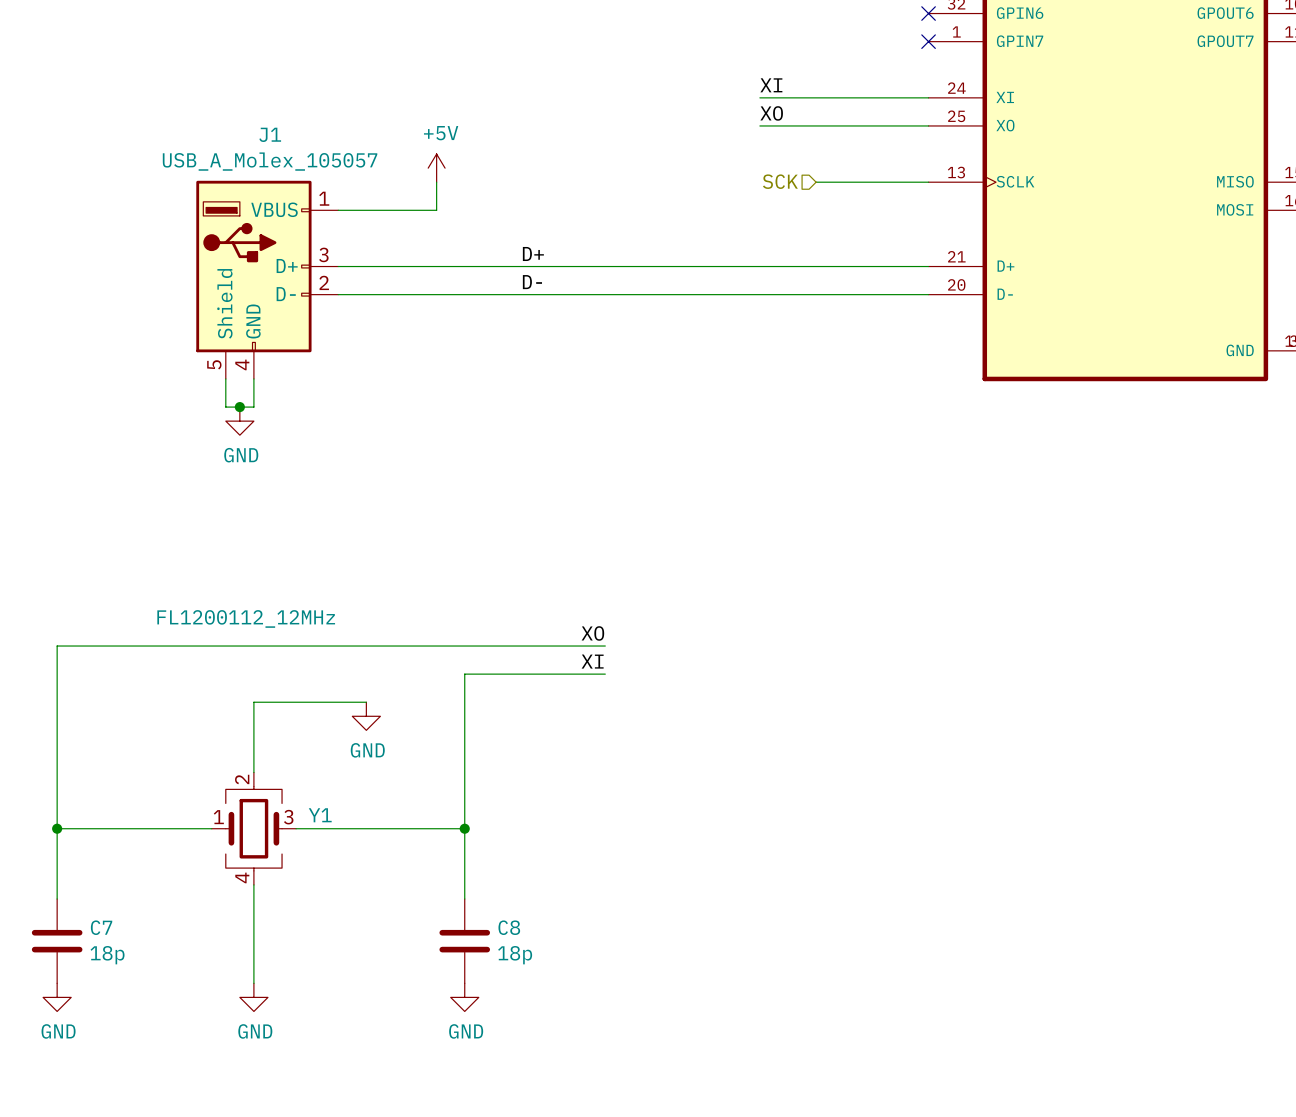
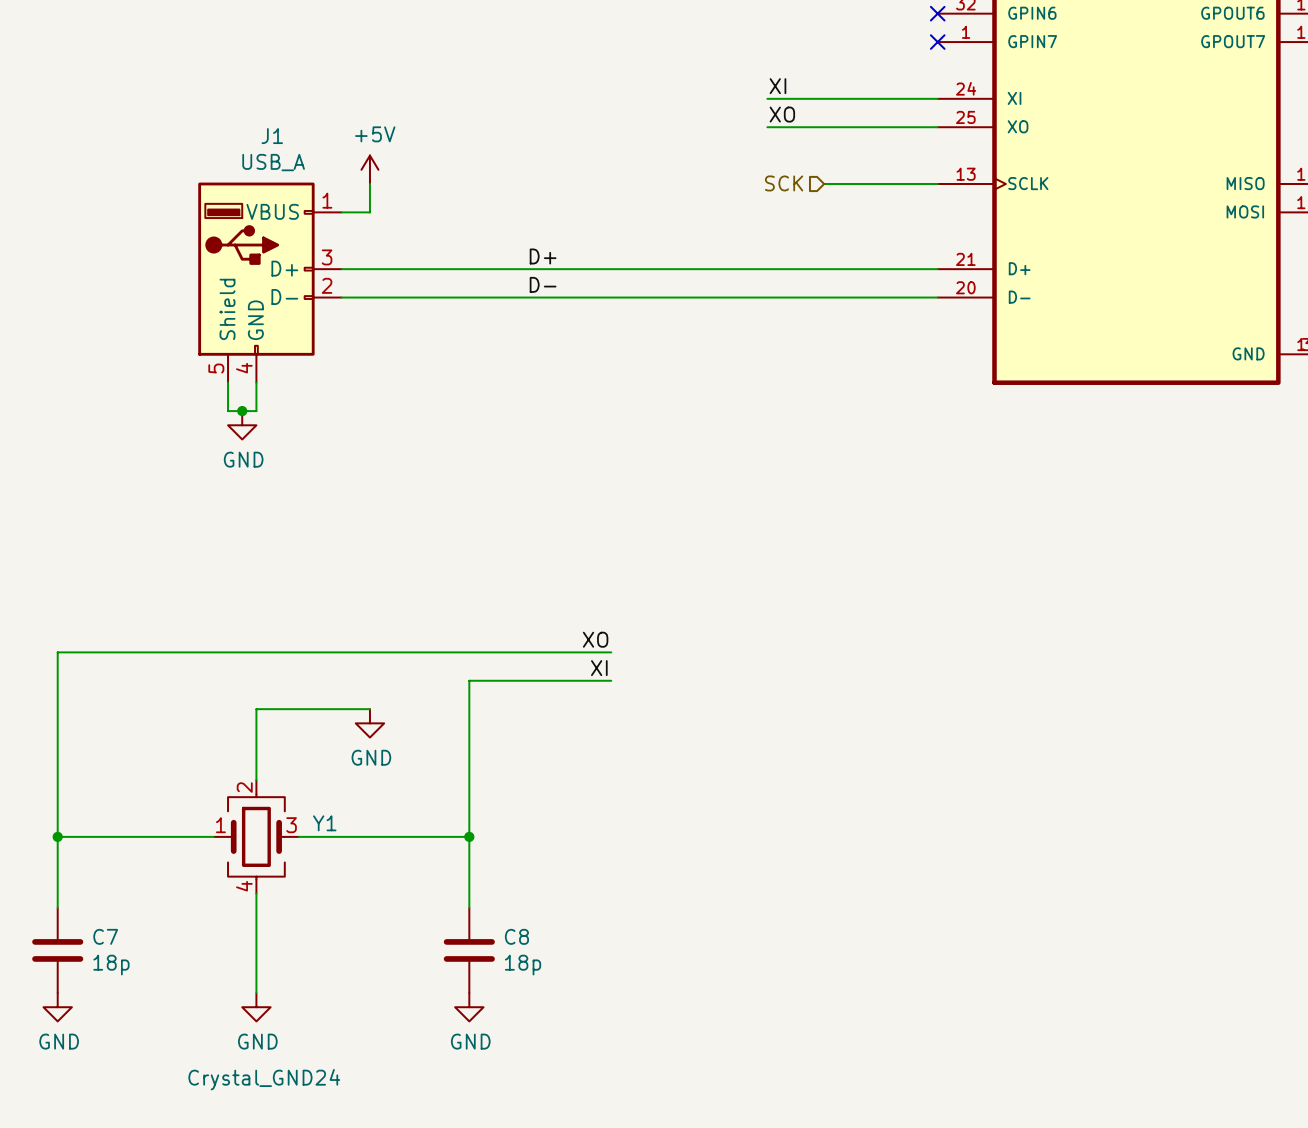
J1 value: USB_A_Molex_105057 (270, 161) -> USB_A (273, 162)
power symbol position: +5V (436, 168) -> +5V (369, 169)
wire: (436, 182) (436, 210) (366, 210) -> (369, 183) (369, 212)
Y1 value: FL1200112_12MHz (246, 618) -> Crystal_GND24 (264, 1079)

